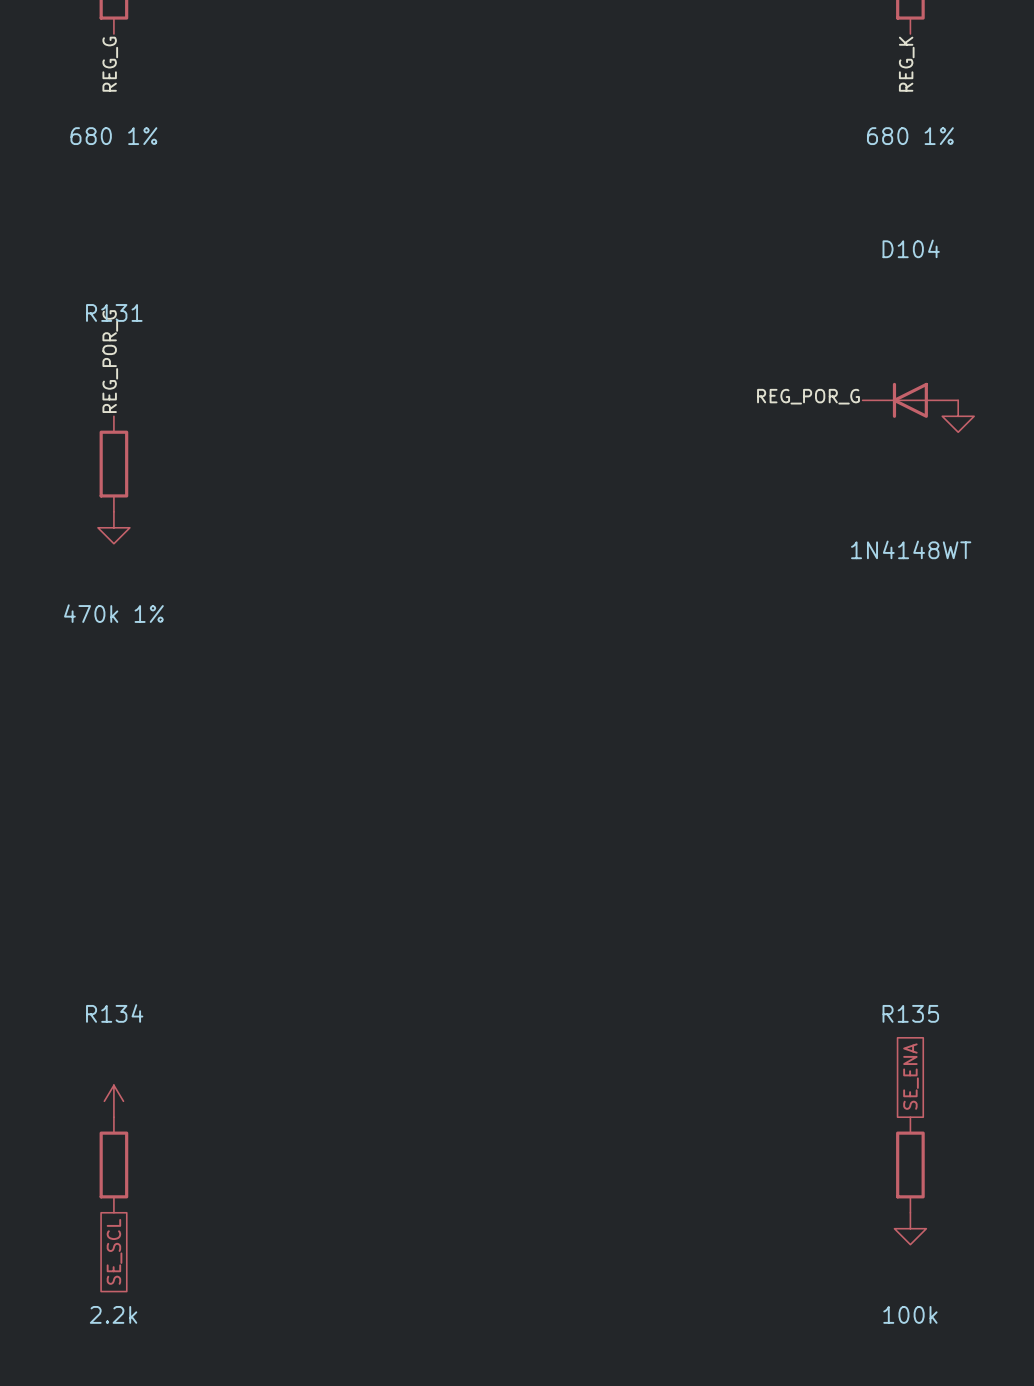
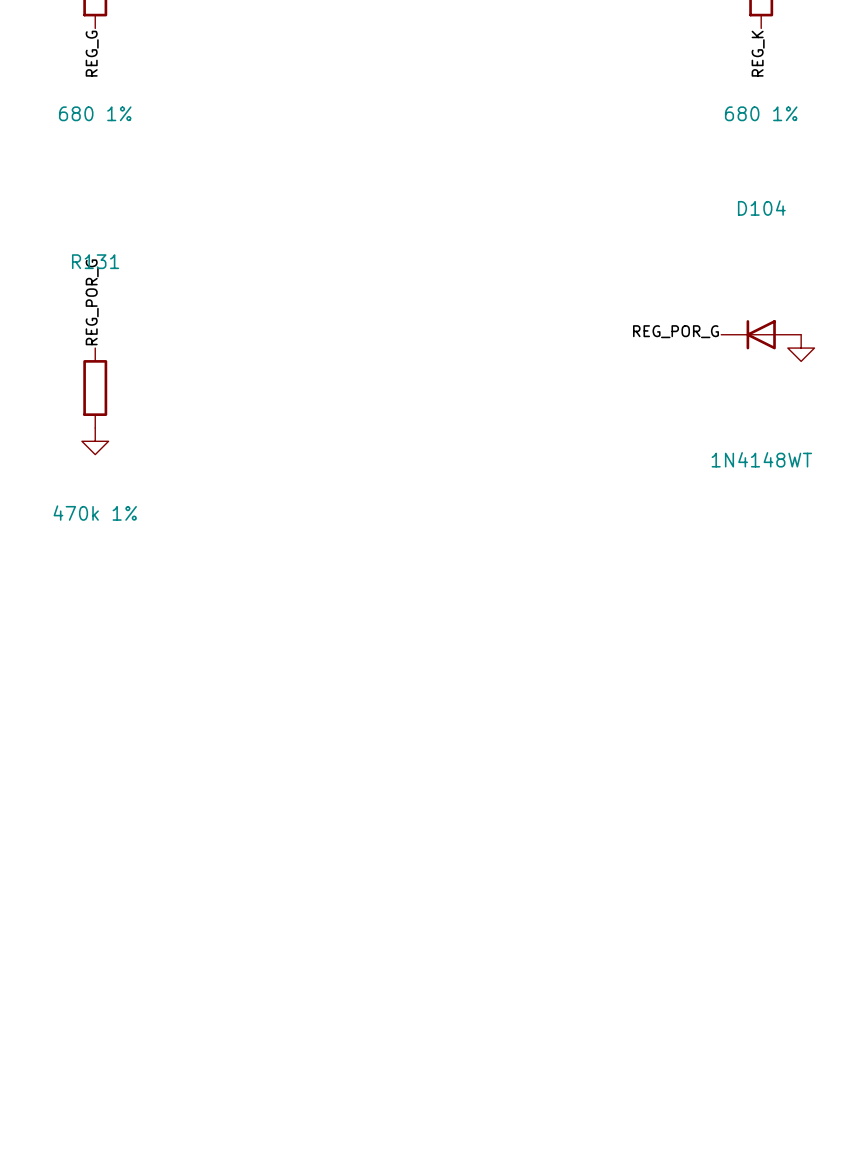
global label: SE_ENA (911, 1076) -> none
power symbol: (113, 1101) -> none
R134: 2.2k (113, 1164) -> none
R135: 100k (910, 1164) -> none
power symbol: (910, 1228) -> none
global label: SE_SCL (114, 1251) -> none

